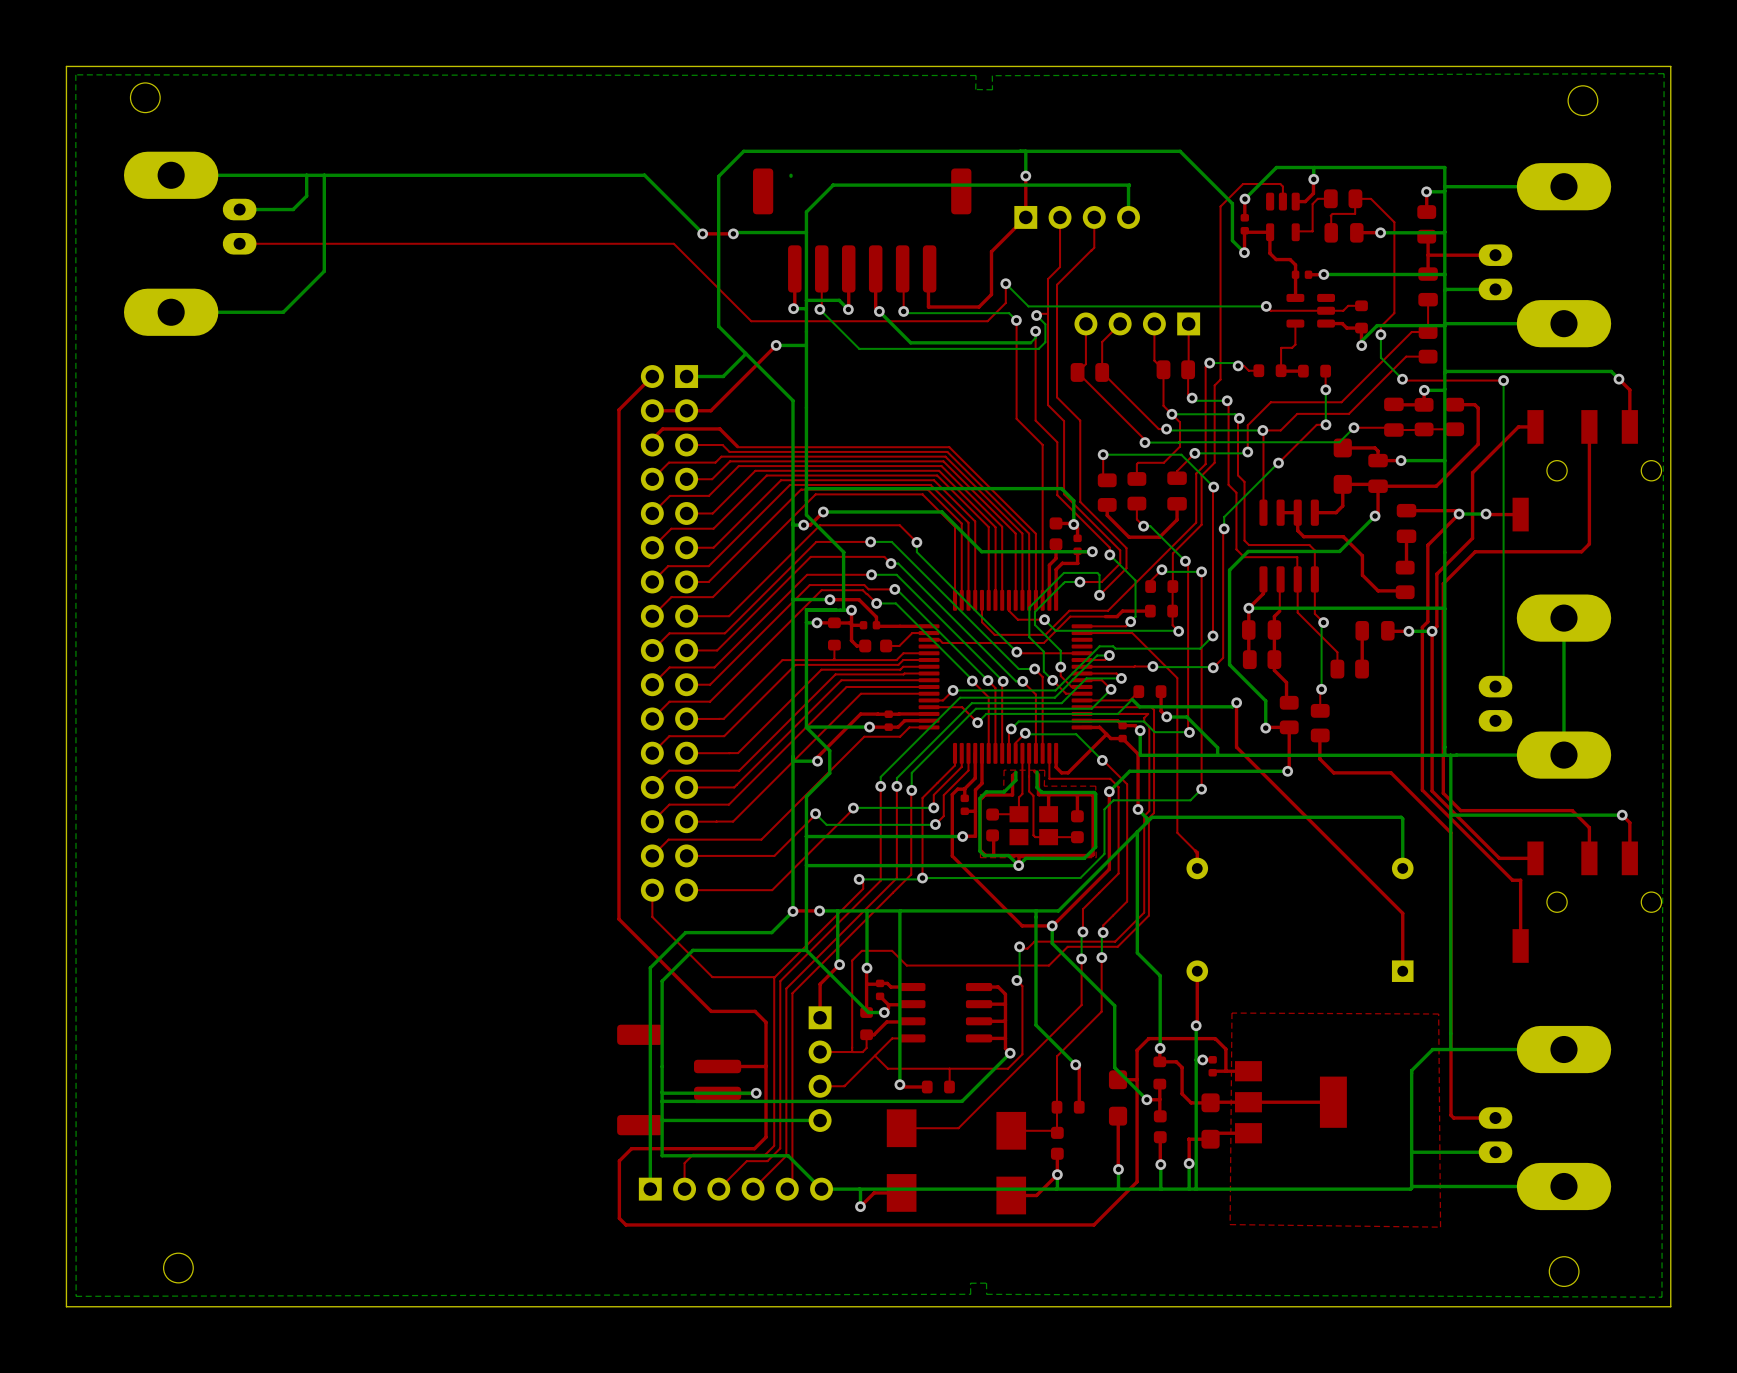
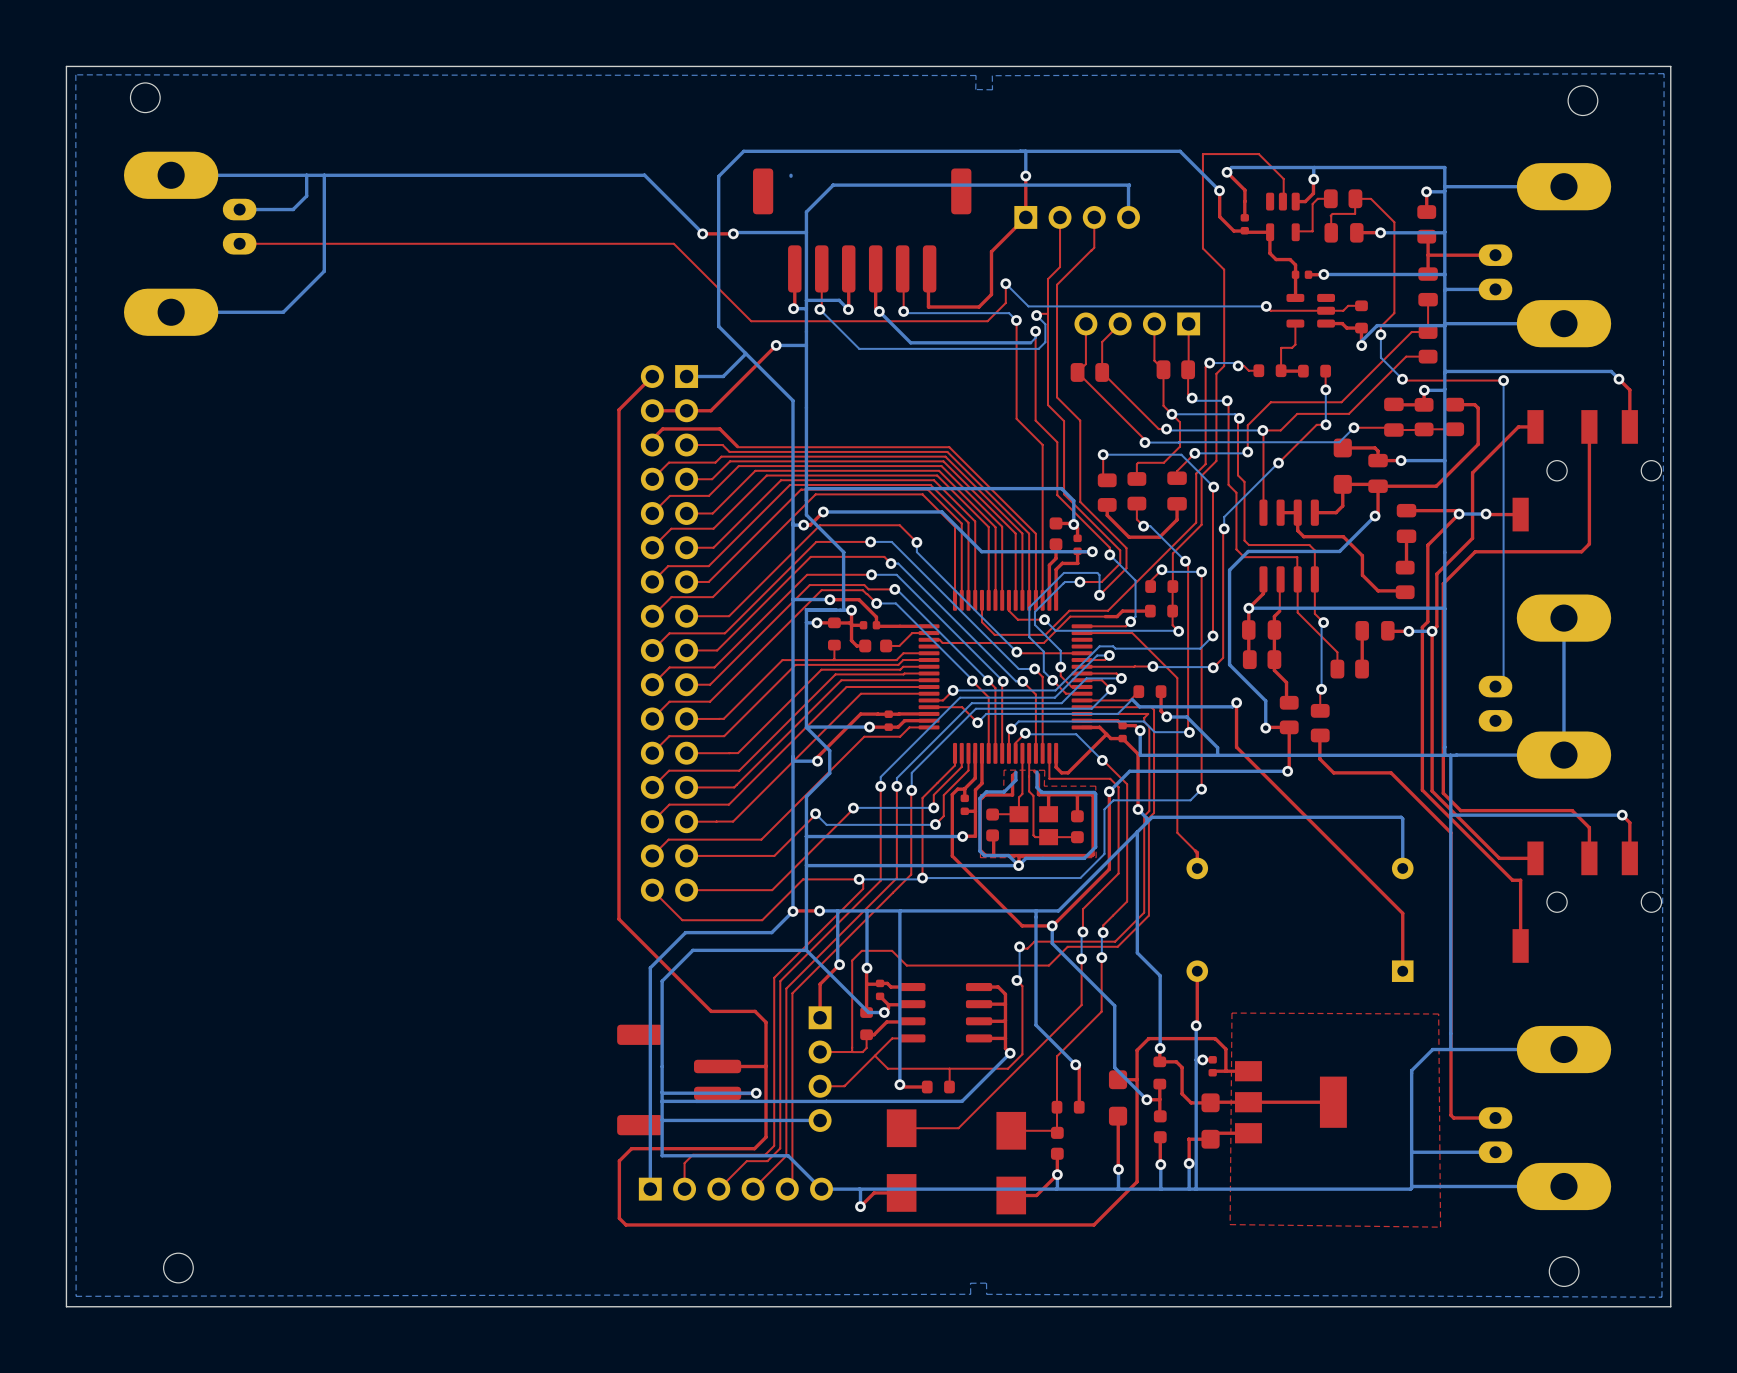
bottom track: (1276, 167) (1244, 199) -> (1276, 167) (1231, 167) (1227, 172)
top track: none -> (1227, 172) (1244, 190) (1244, 199)
via: none -> (1227, 172)
bottom track: (1219, 190) (1232, 203) (1232, 240) (1244, 252) -> none
via: none -> (1219, 190)
via: (1244, 199) -> none
top track: (1282, 201) (1282, 186) (1280, 183) (1243, 183) (1220, 206) (1220, 379) (1214, 385) (1214, 462) -> (1282, 201) (1283, 178) (1258, 154) (1202, 154) (1202, 248) (1224, 269) (1224, 366) (1216, 373) (1216, 460) (1214, 462)
top track: (1244, 231) (1244, 252) -> (1244, 231) (1233, 231) (1219, 216) (1219, 190)
via: (1244, 252) -> none
top track: (652, 890) (652, 917) (712, 977) (774, 977) -> (652, 890) (682, 920) (762, 920) (803, 879) (859, 879)

